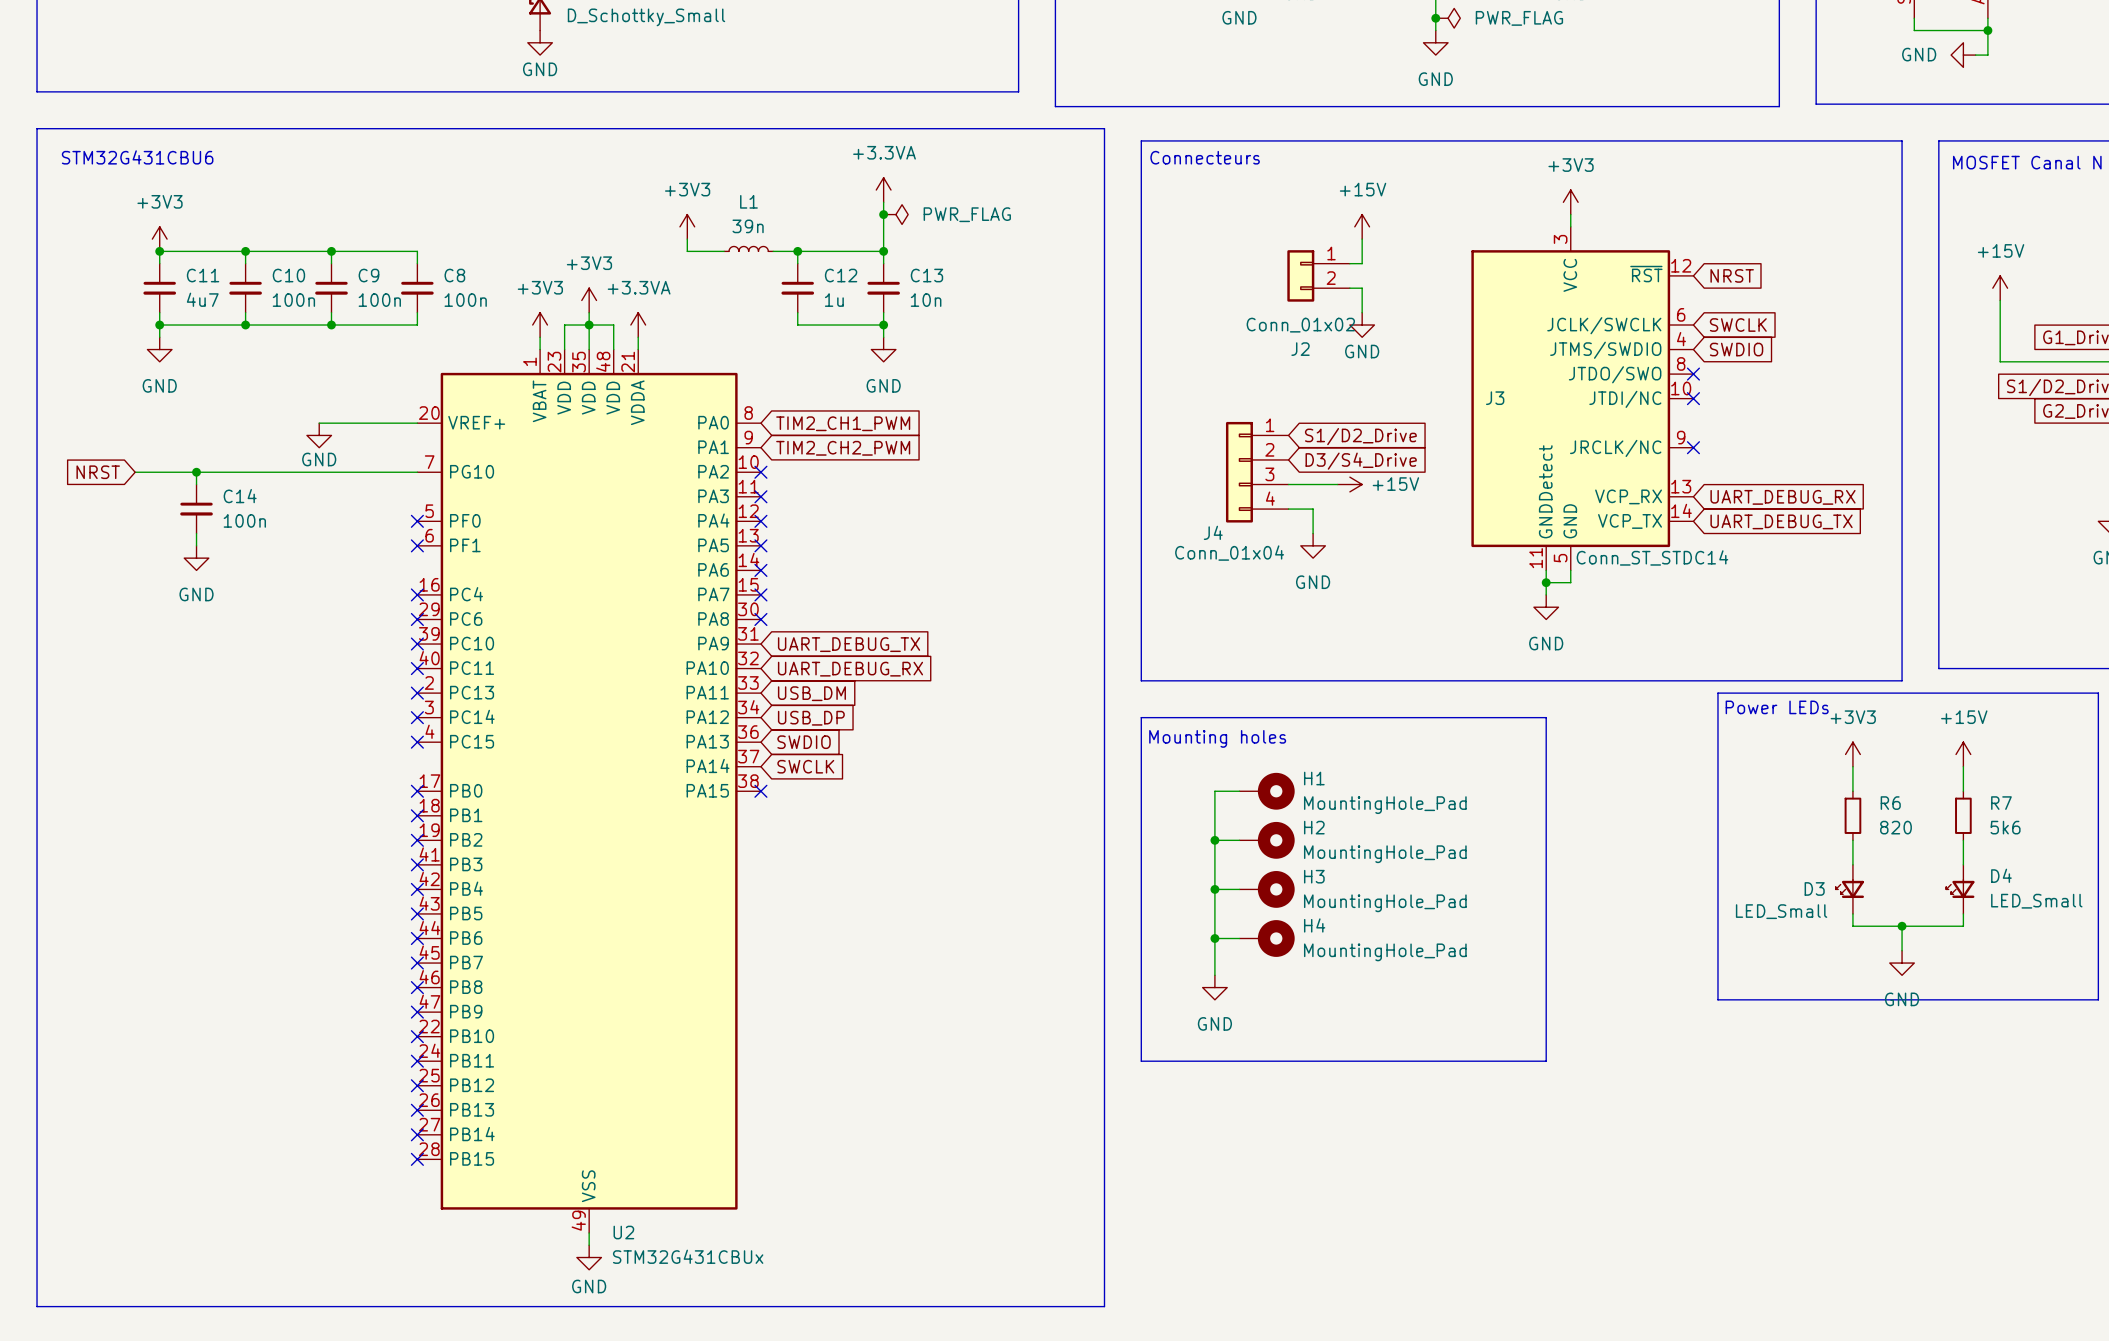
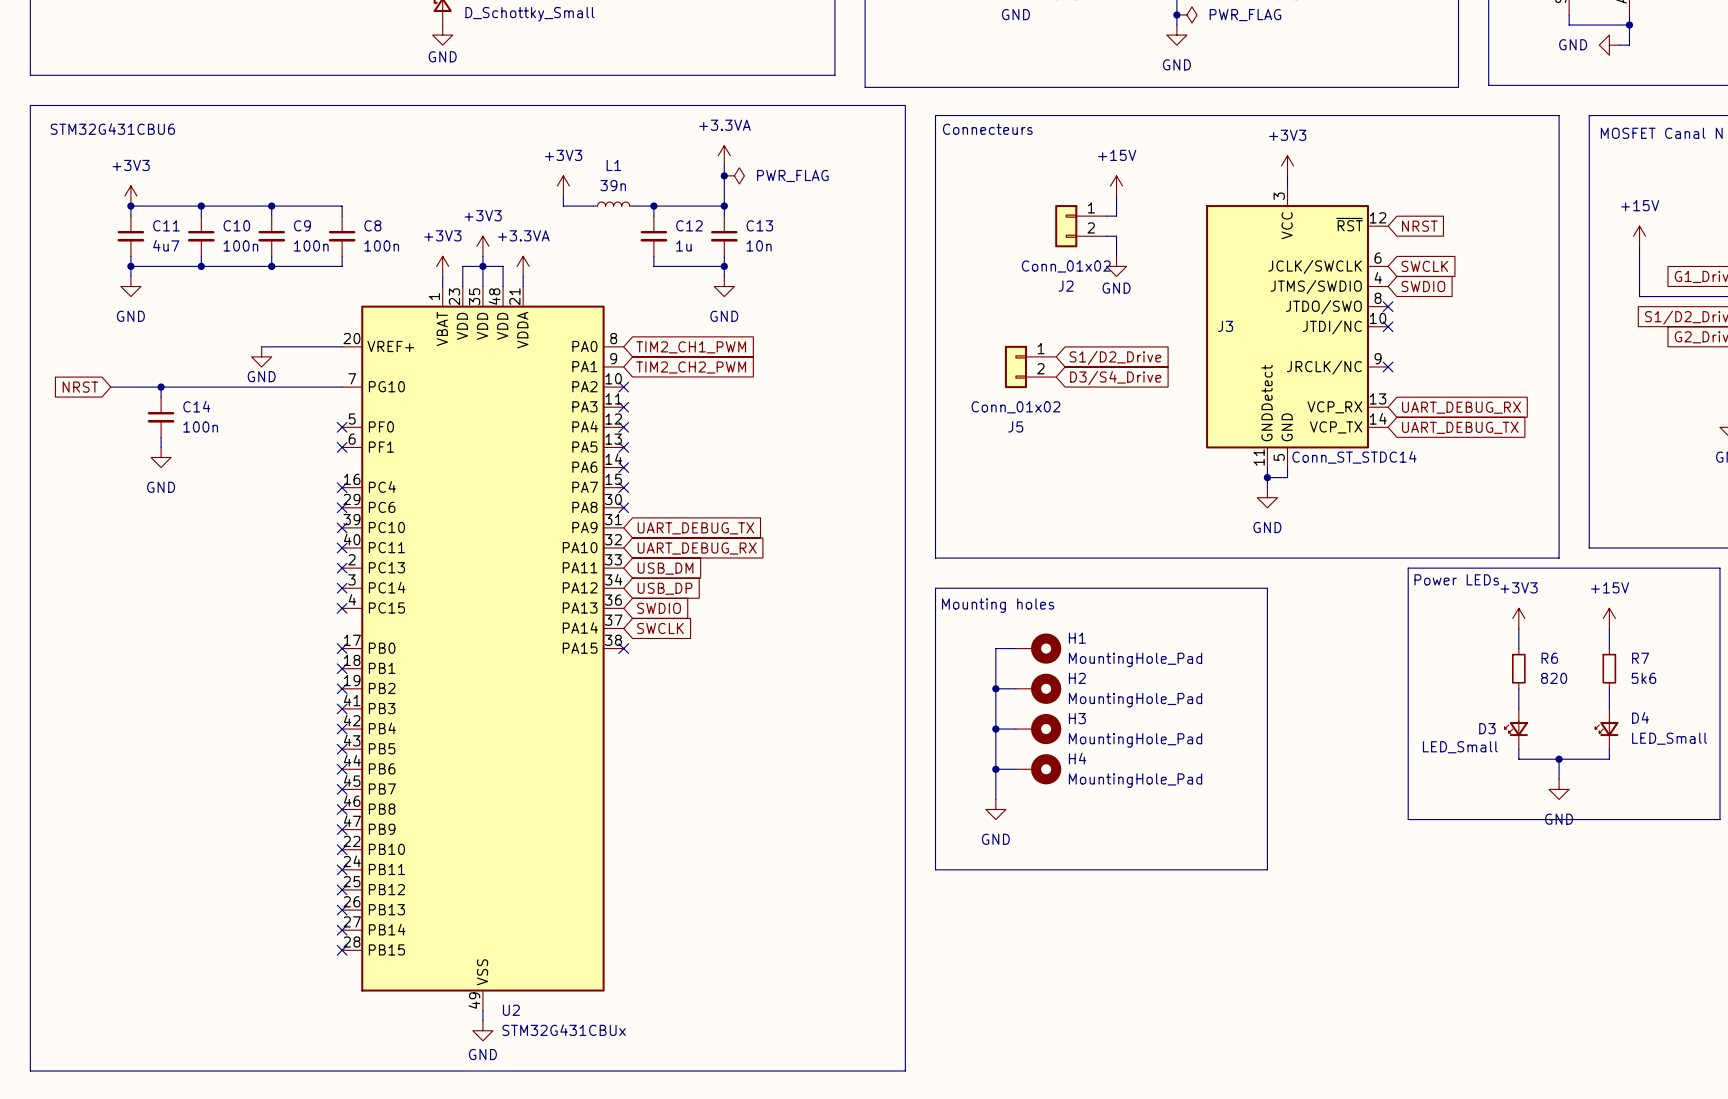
J5: none -> Conn_01x02 (1030, 366)
J4: Conn_01x04 (1257, 472) -> none
wire: (1288, 484) (1337, 484) -> none
power symbol: +15V (1349, 484) -> none
wire: (1288, 509) (1313, 509) (1313, 533) -> none
power symbol: GND (1313, 545) -> none

